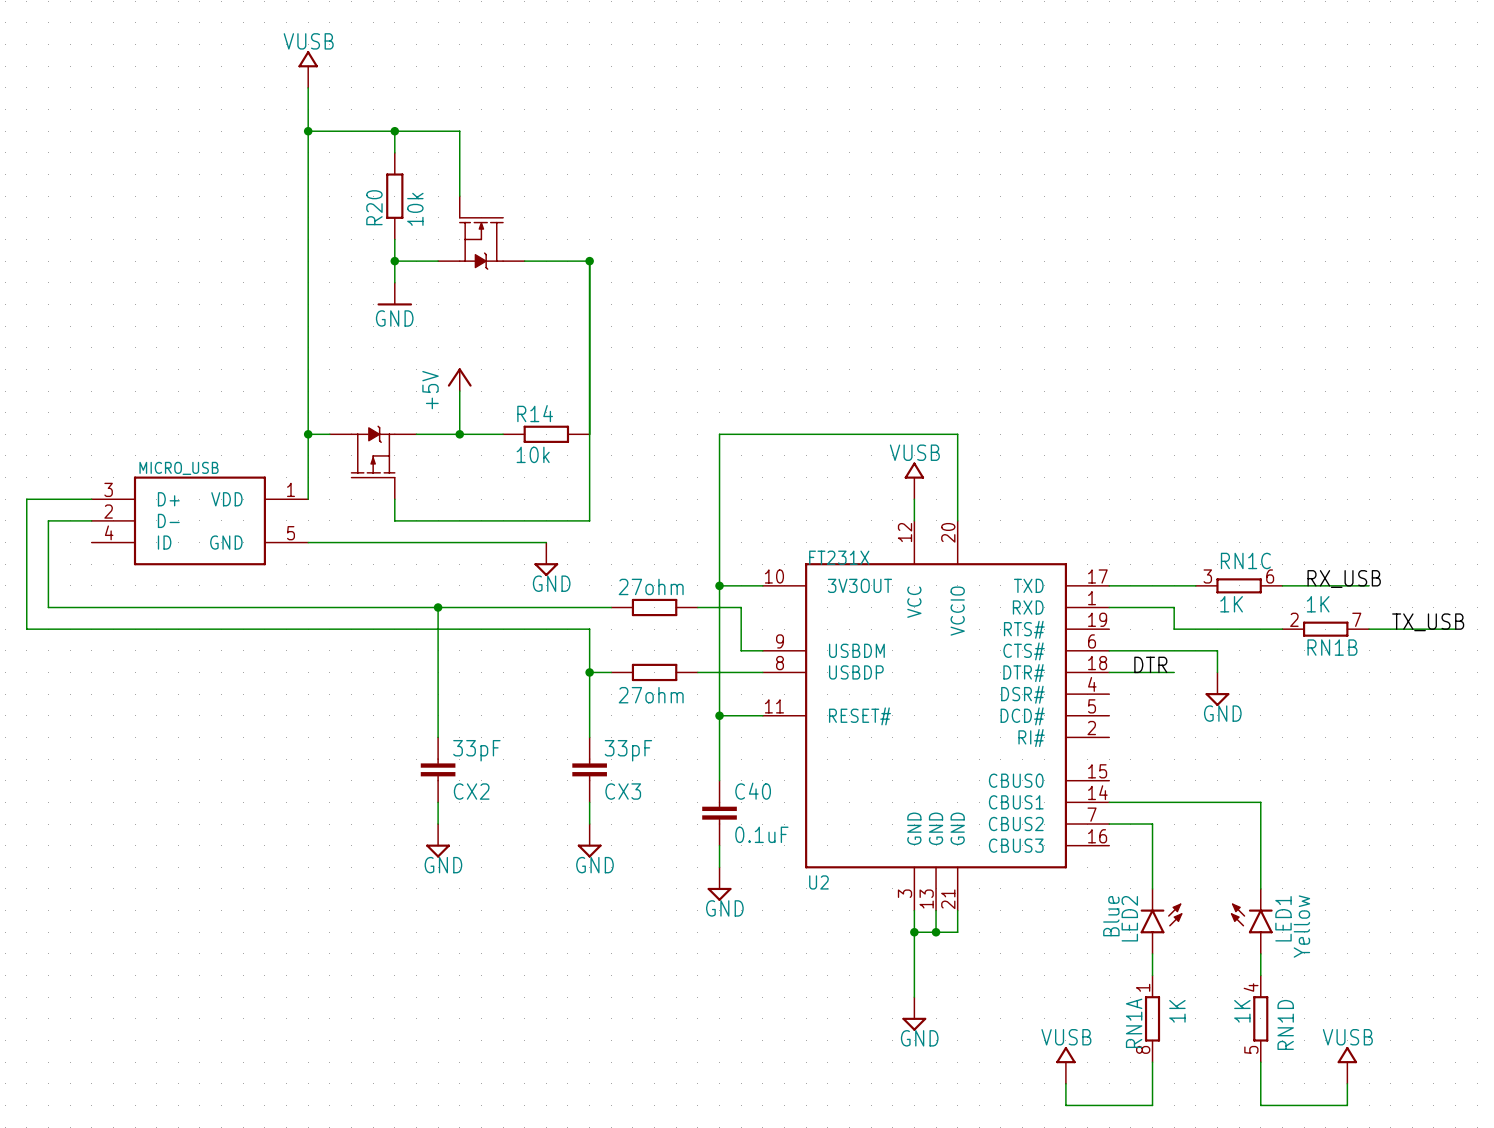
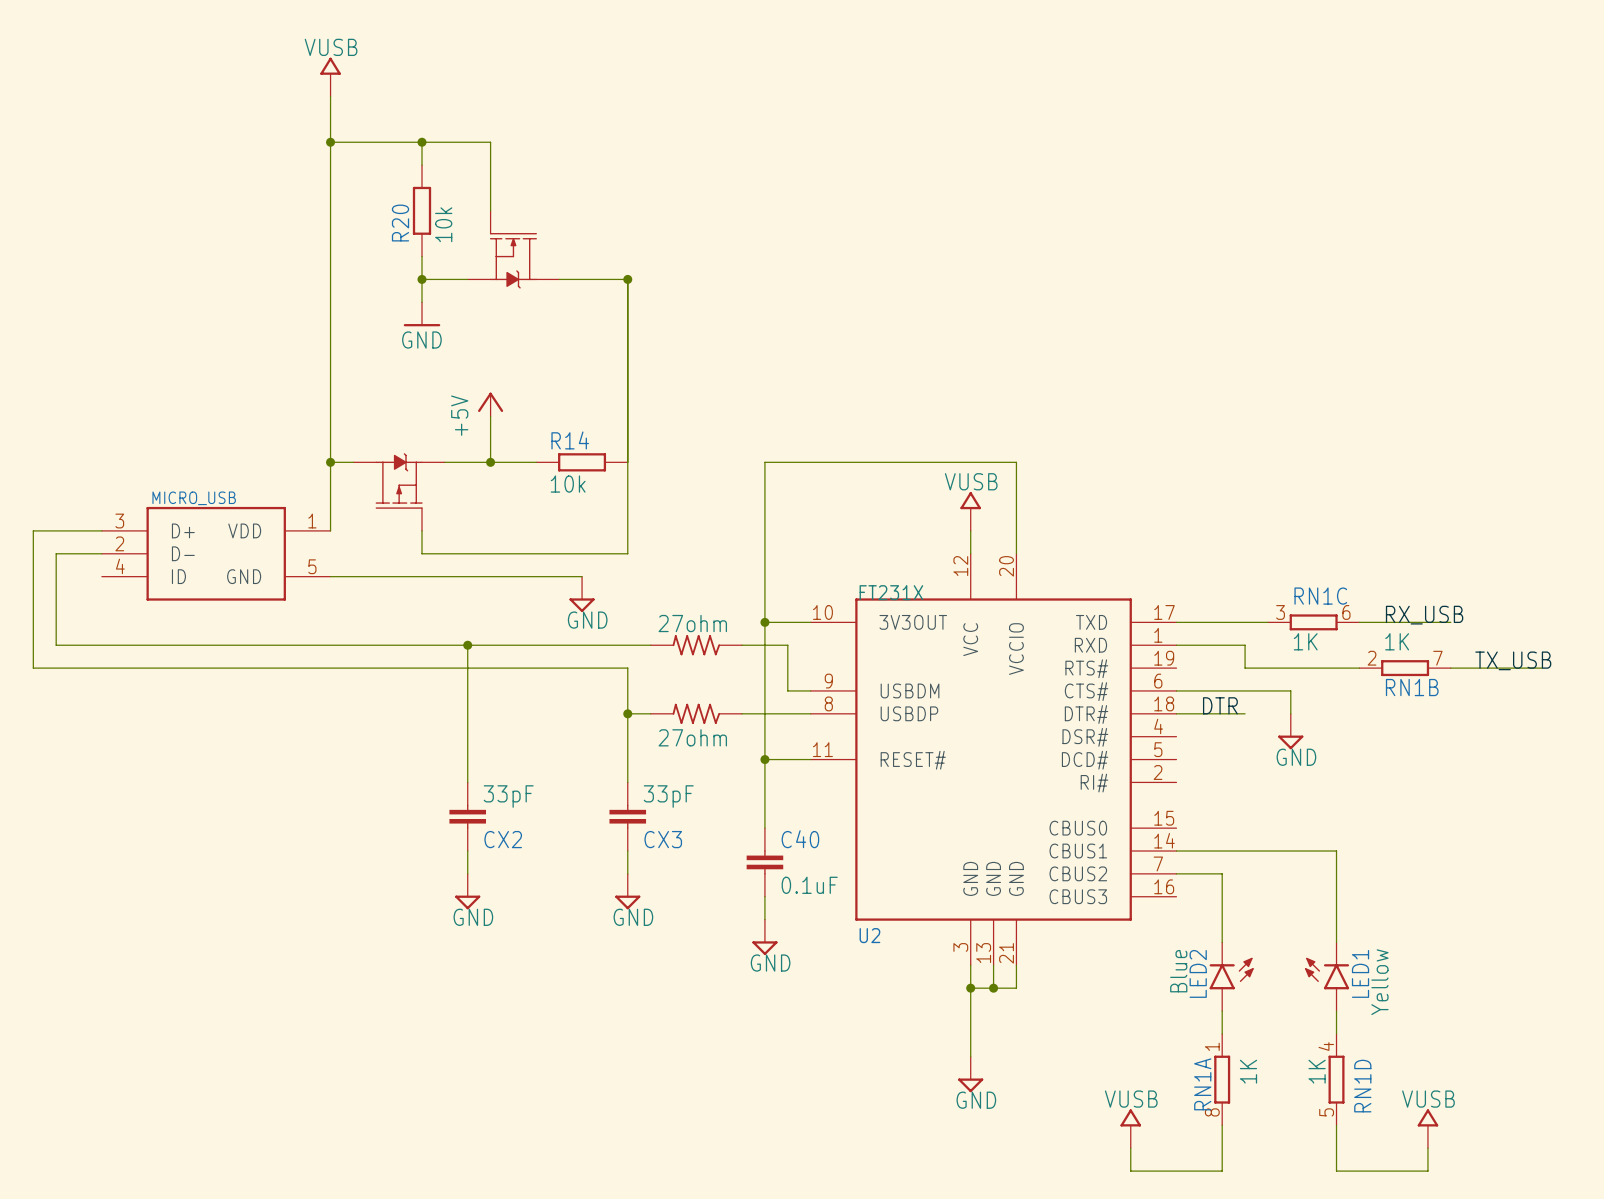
part symbol: [611, 598, 698, 617] -> [650, 635, 743, 656]
part symbol: [611, 663, 698, 682] -> [650, 703, 743, 724]

